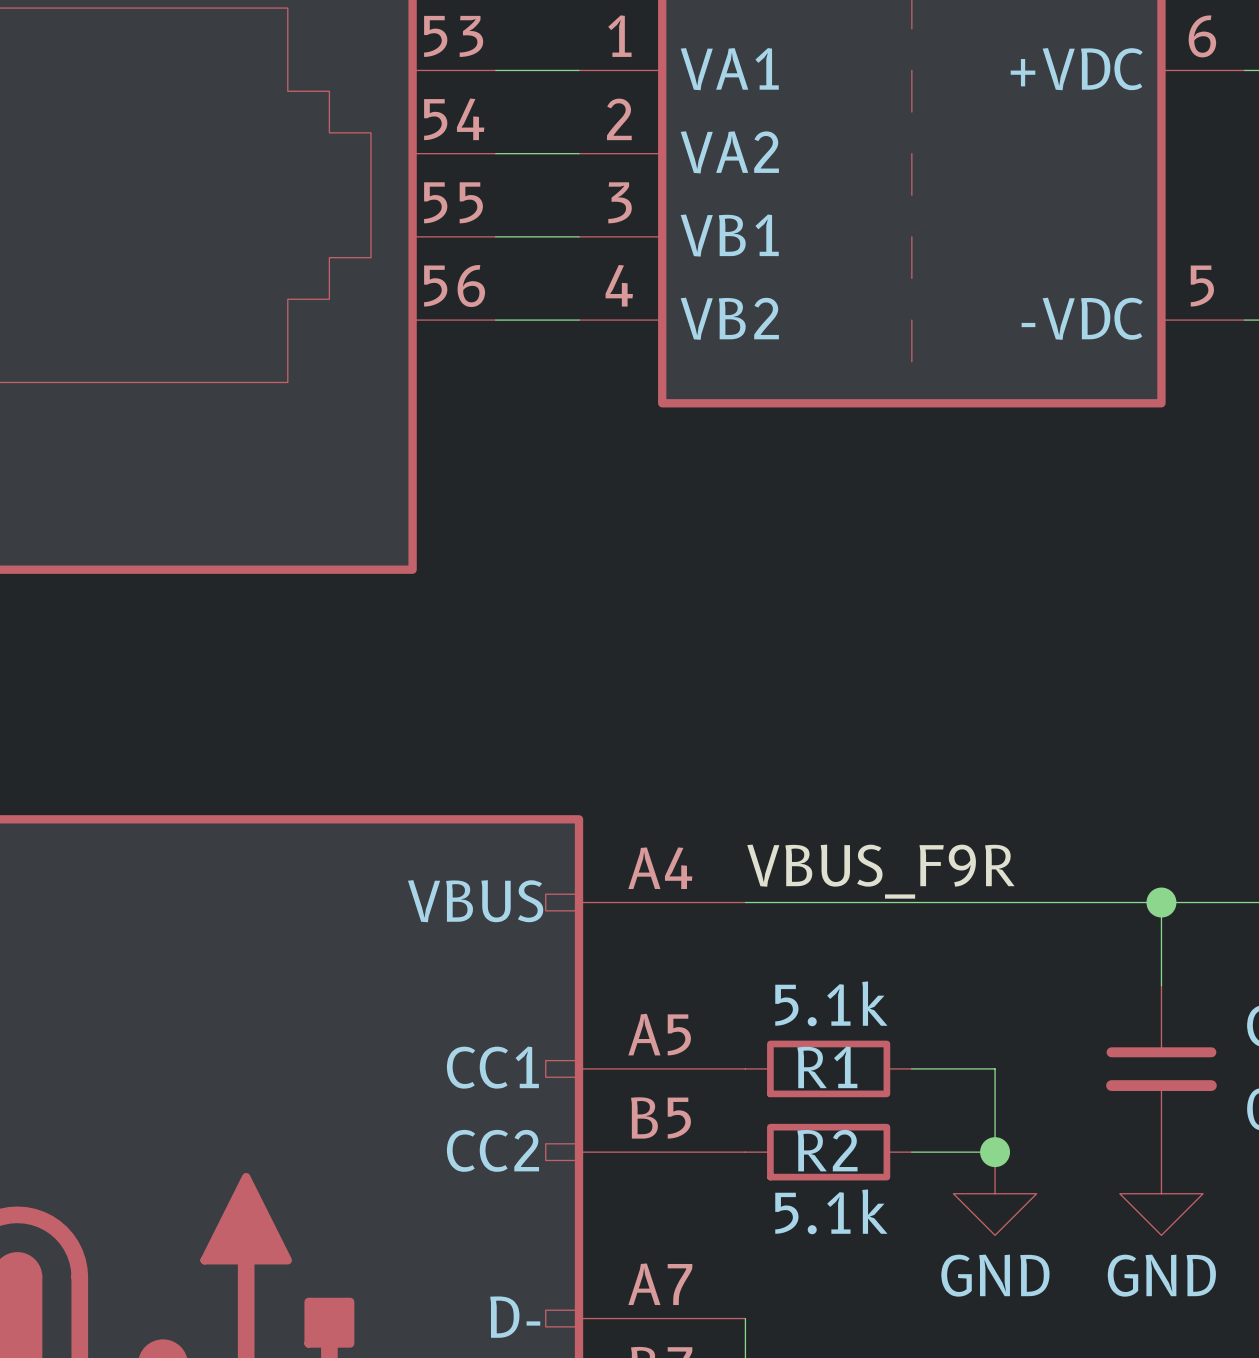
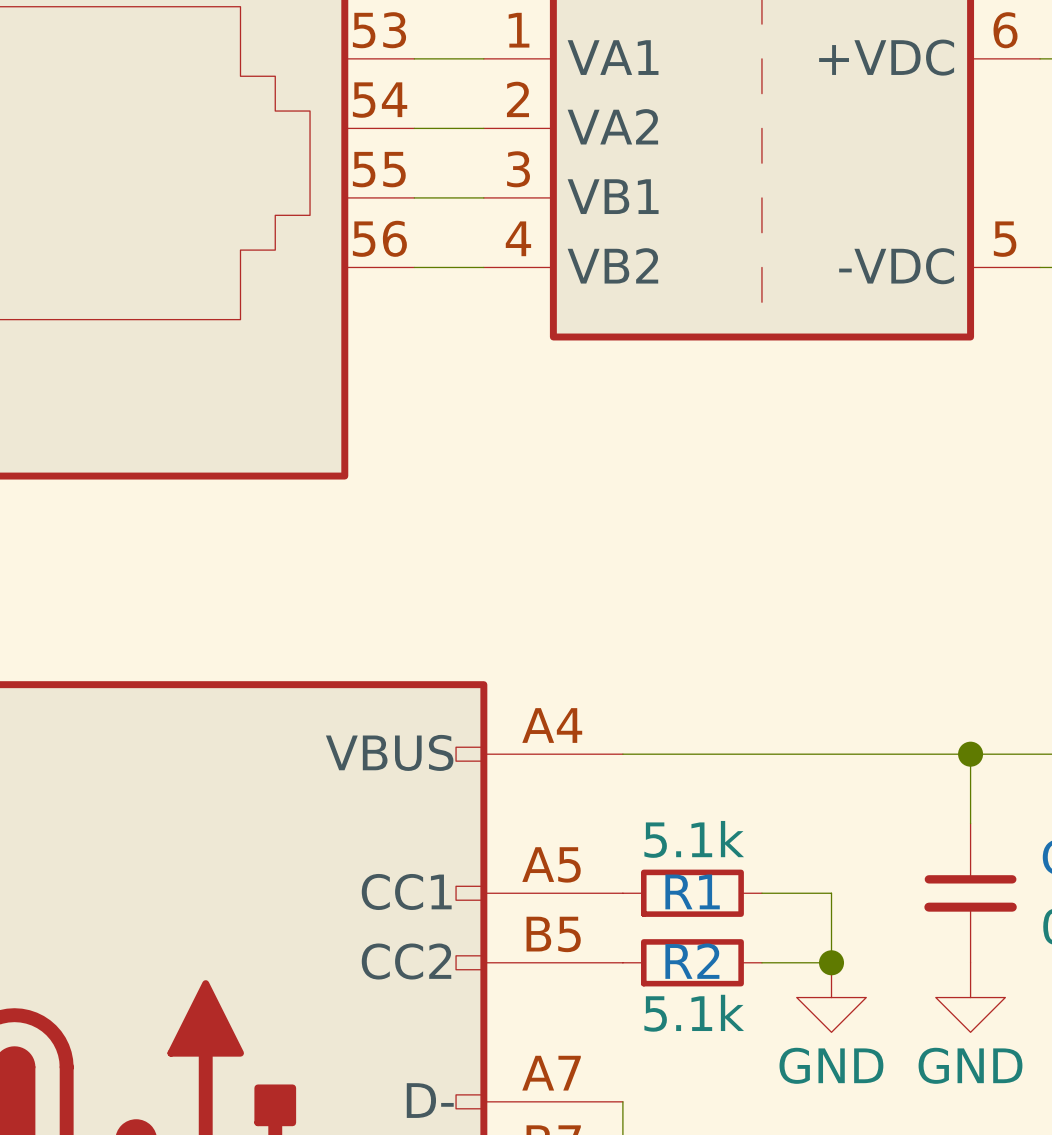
label: VBUS_F9R (880, 871) -> none

